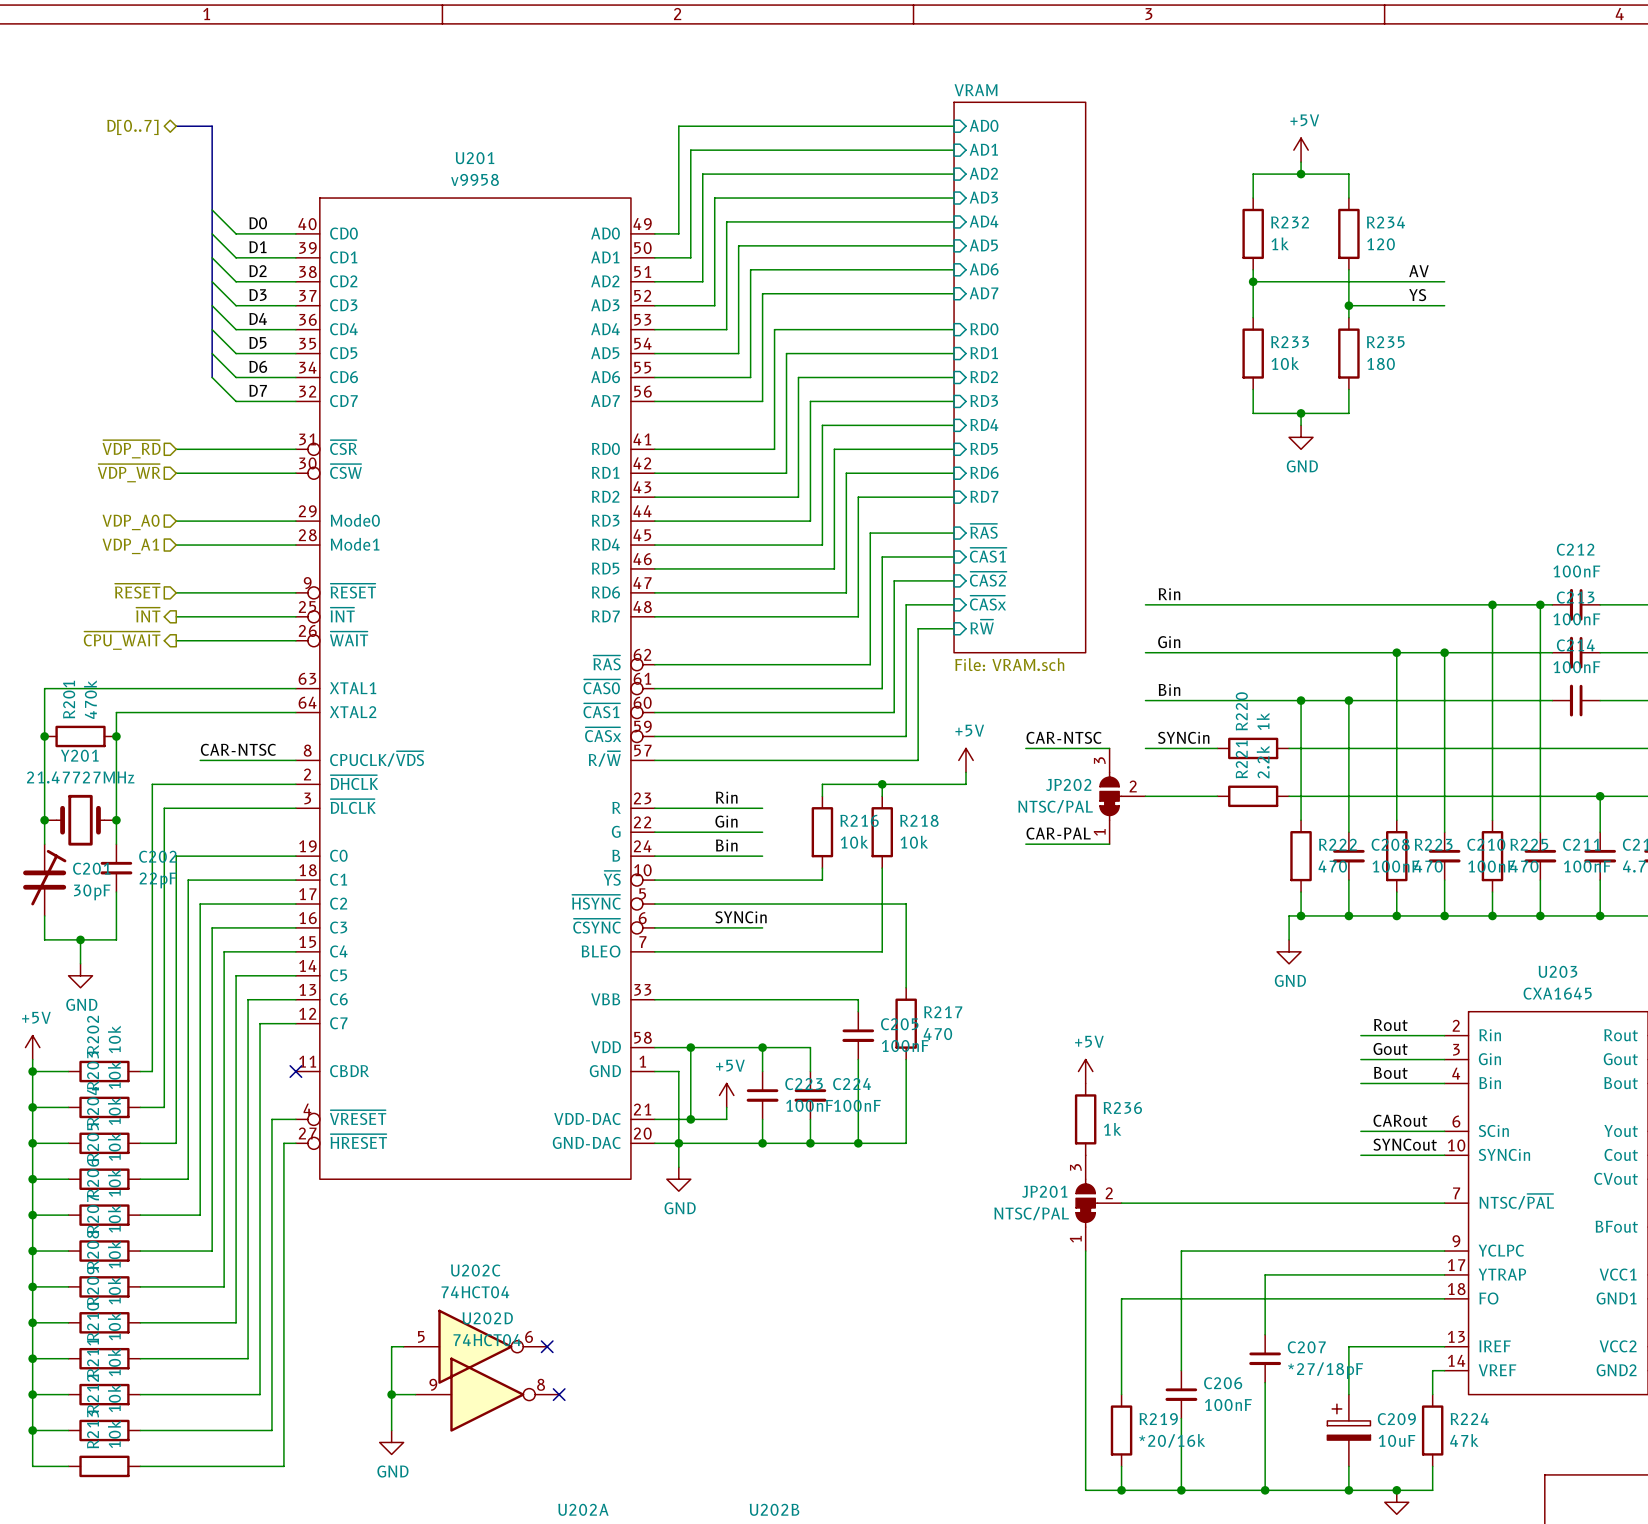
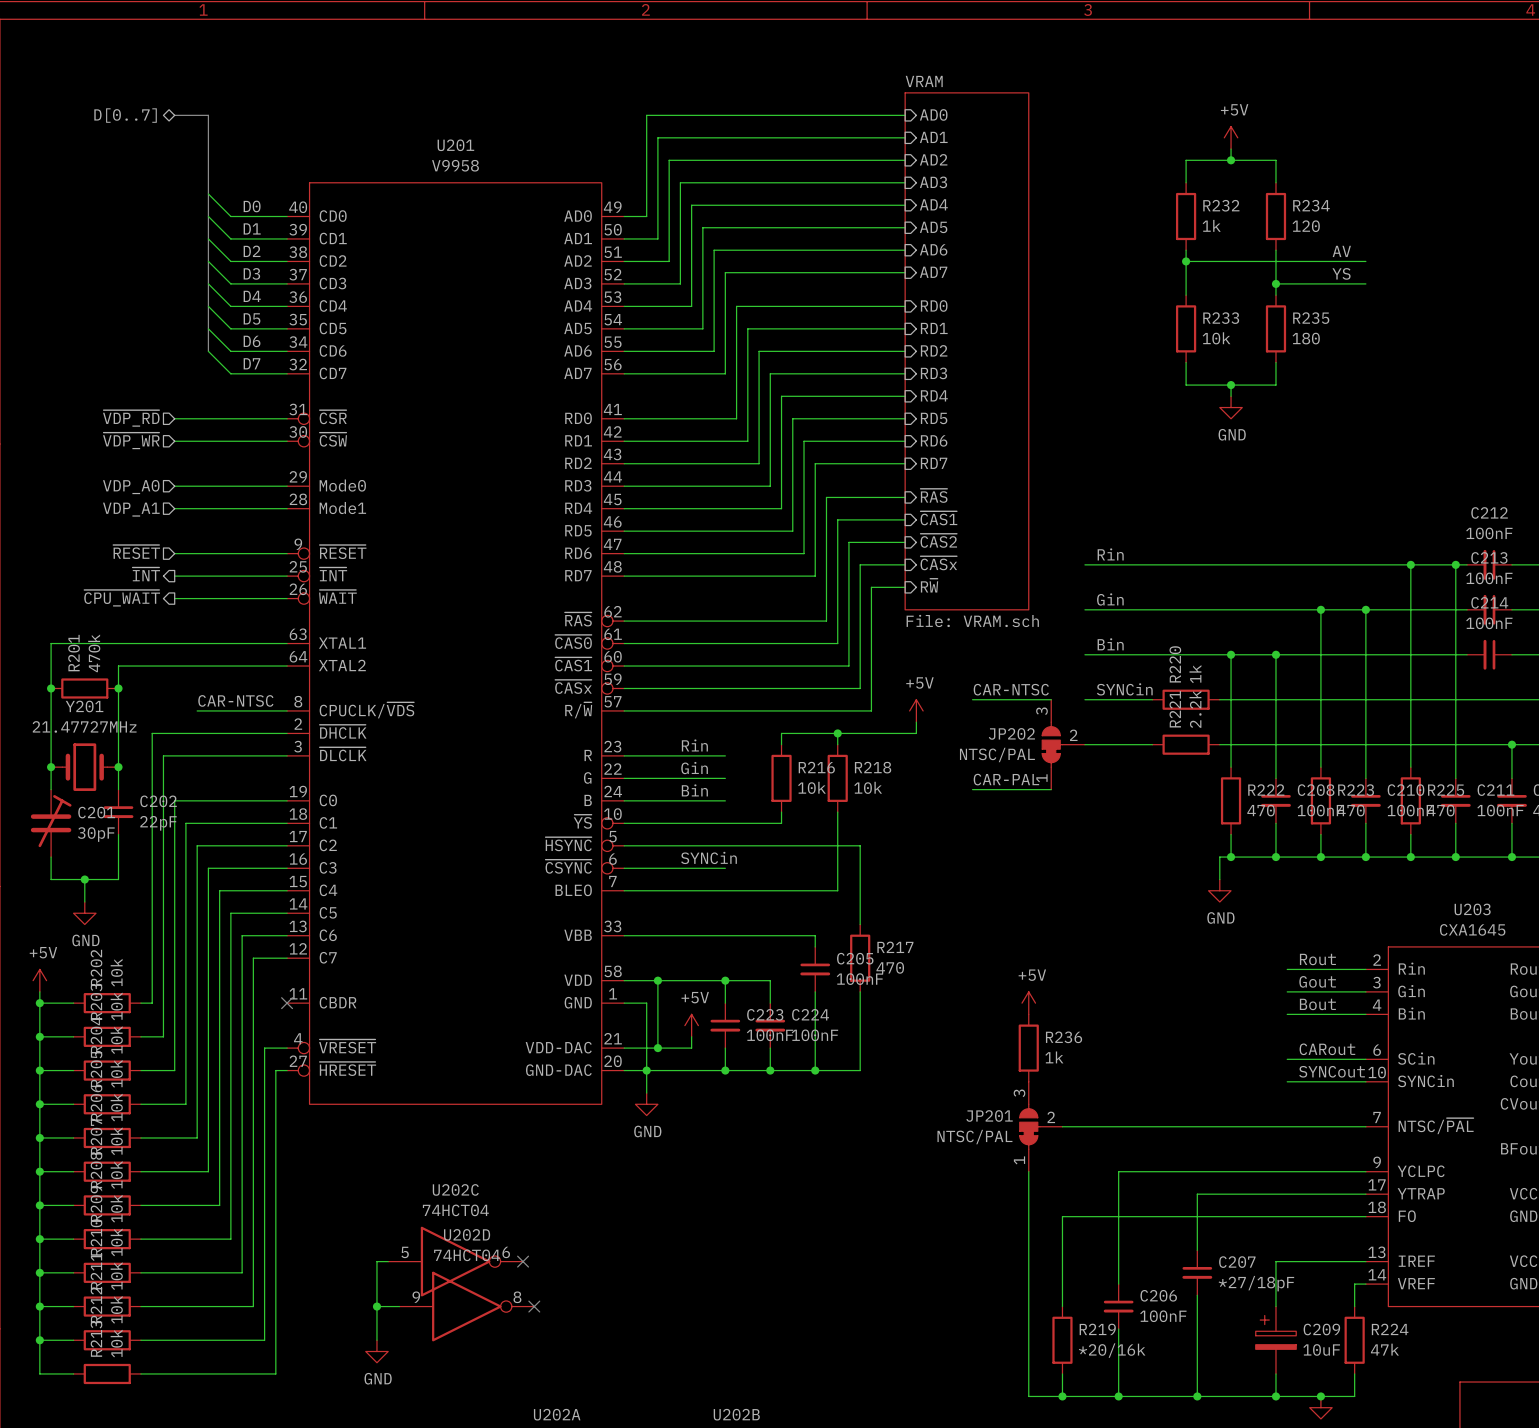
U201 value: v9958 (475, 179) -> V9958 (455, 165)

